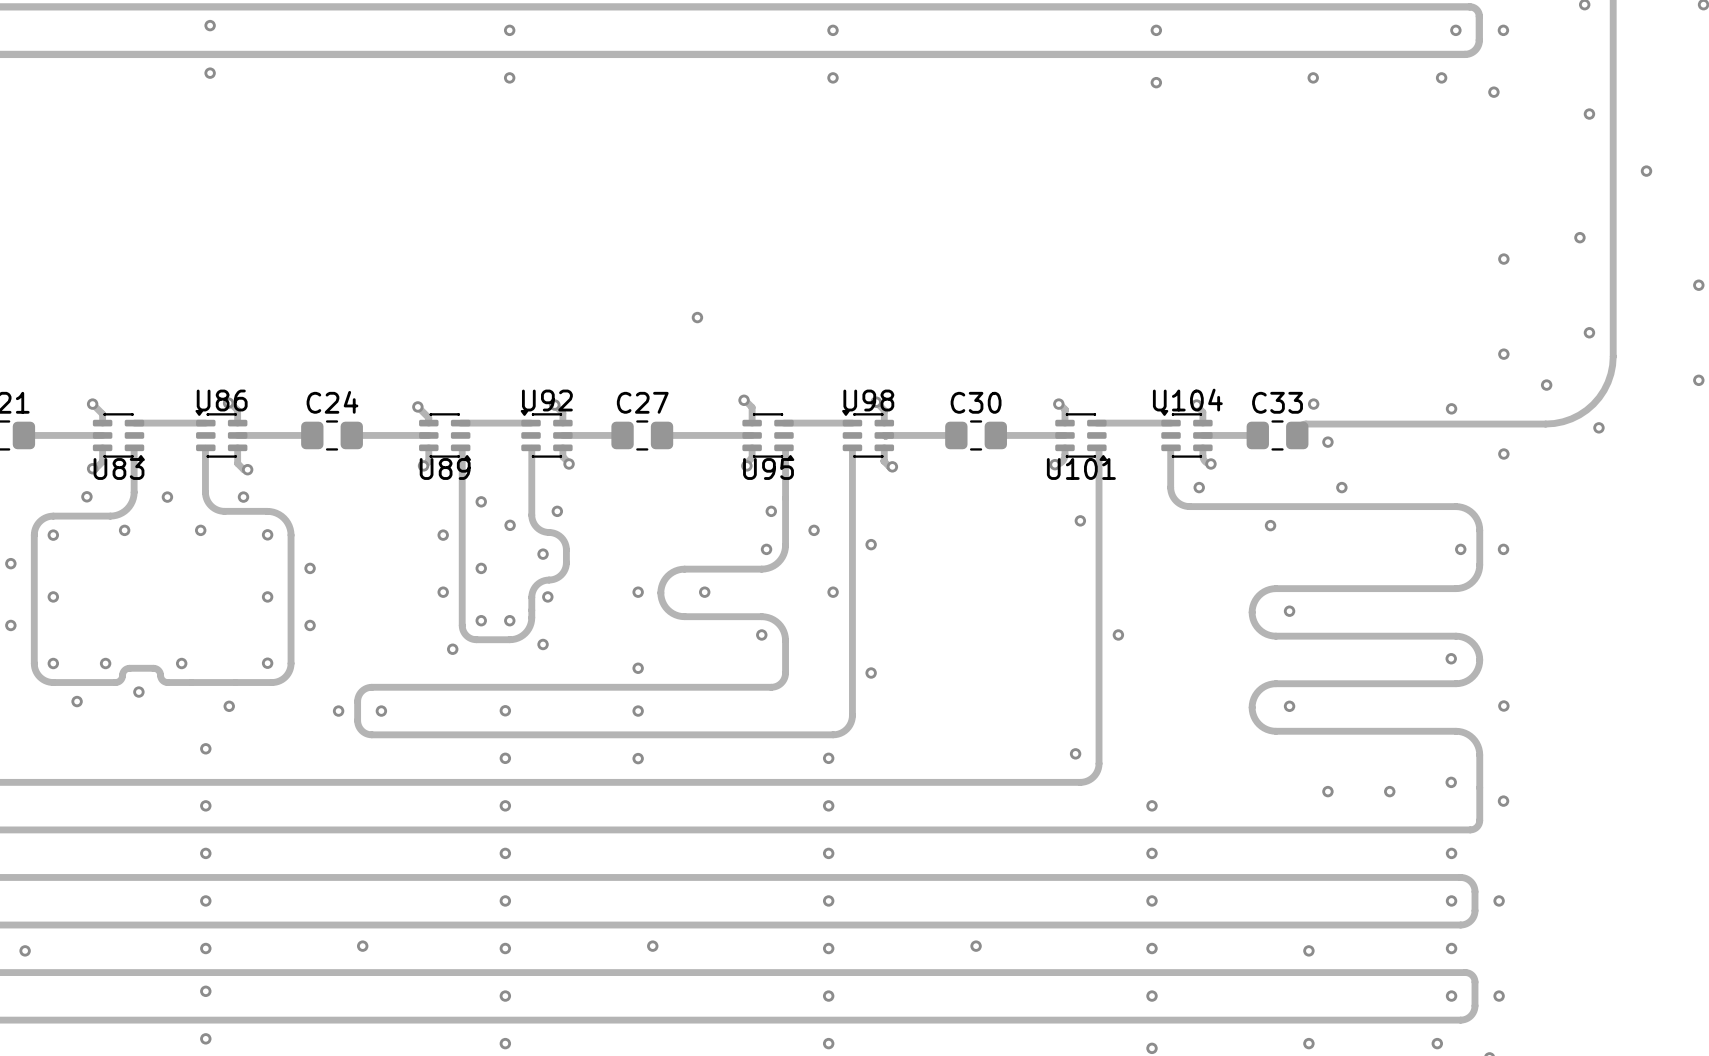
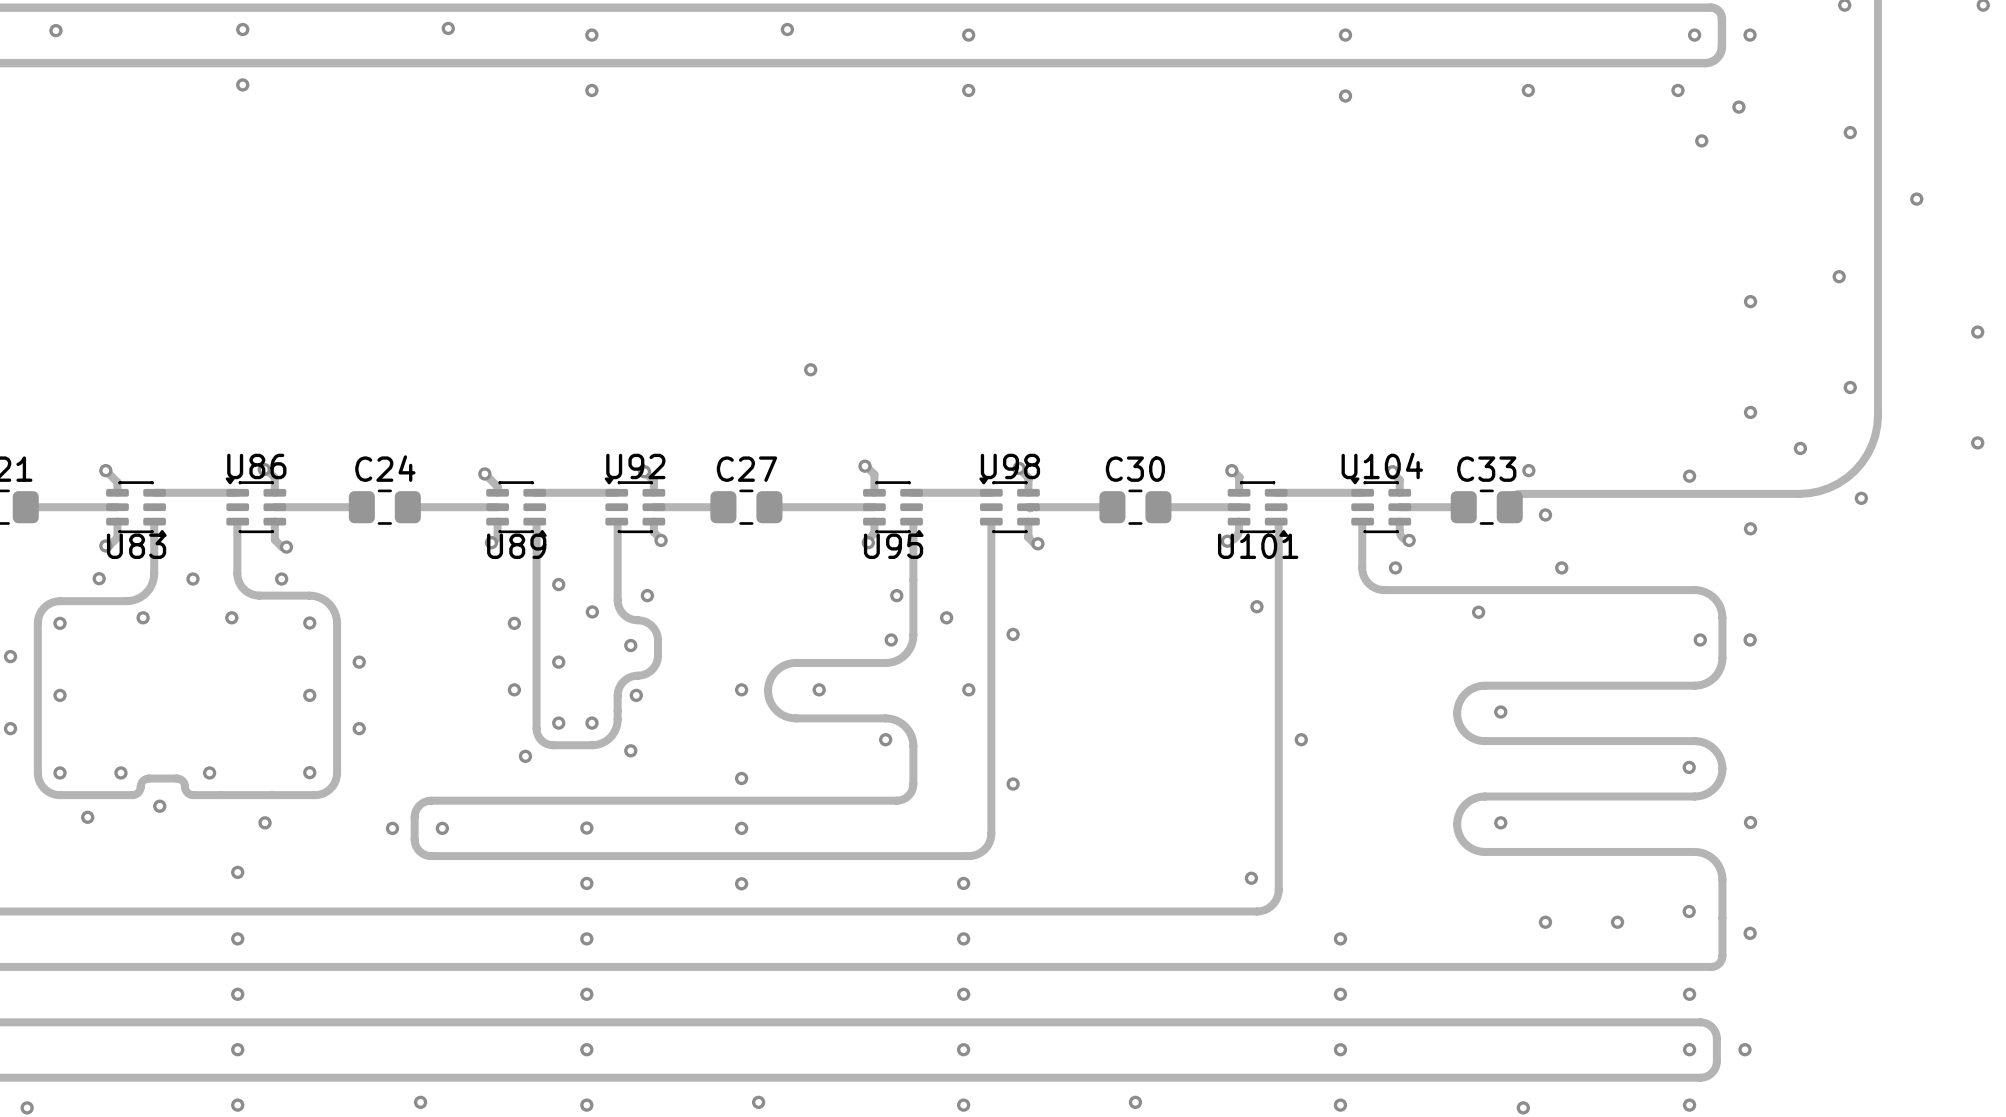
via: none -> (448, 28)
via: none -> (787, 29)
via: none -> (55, 30)
via: none -> (1701, 140)

